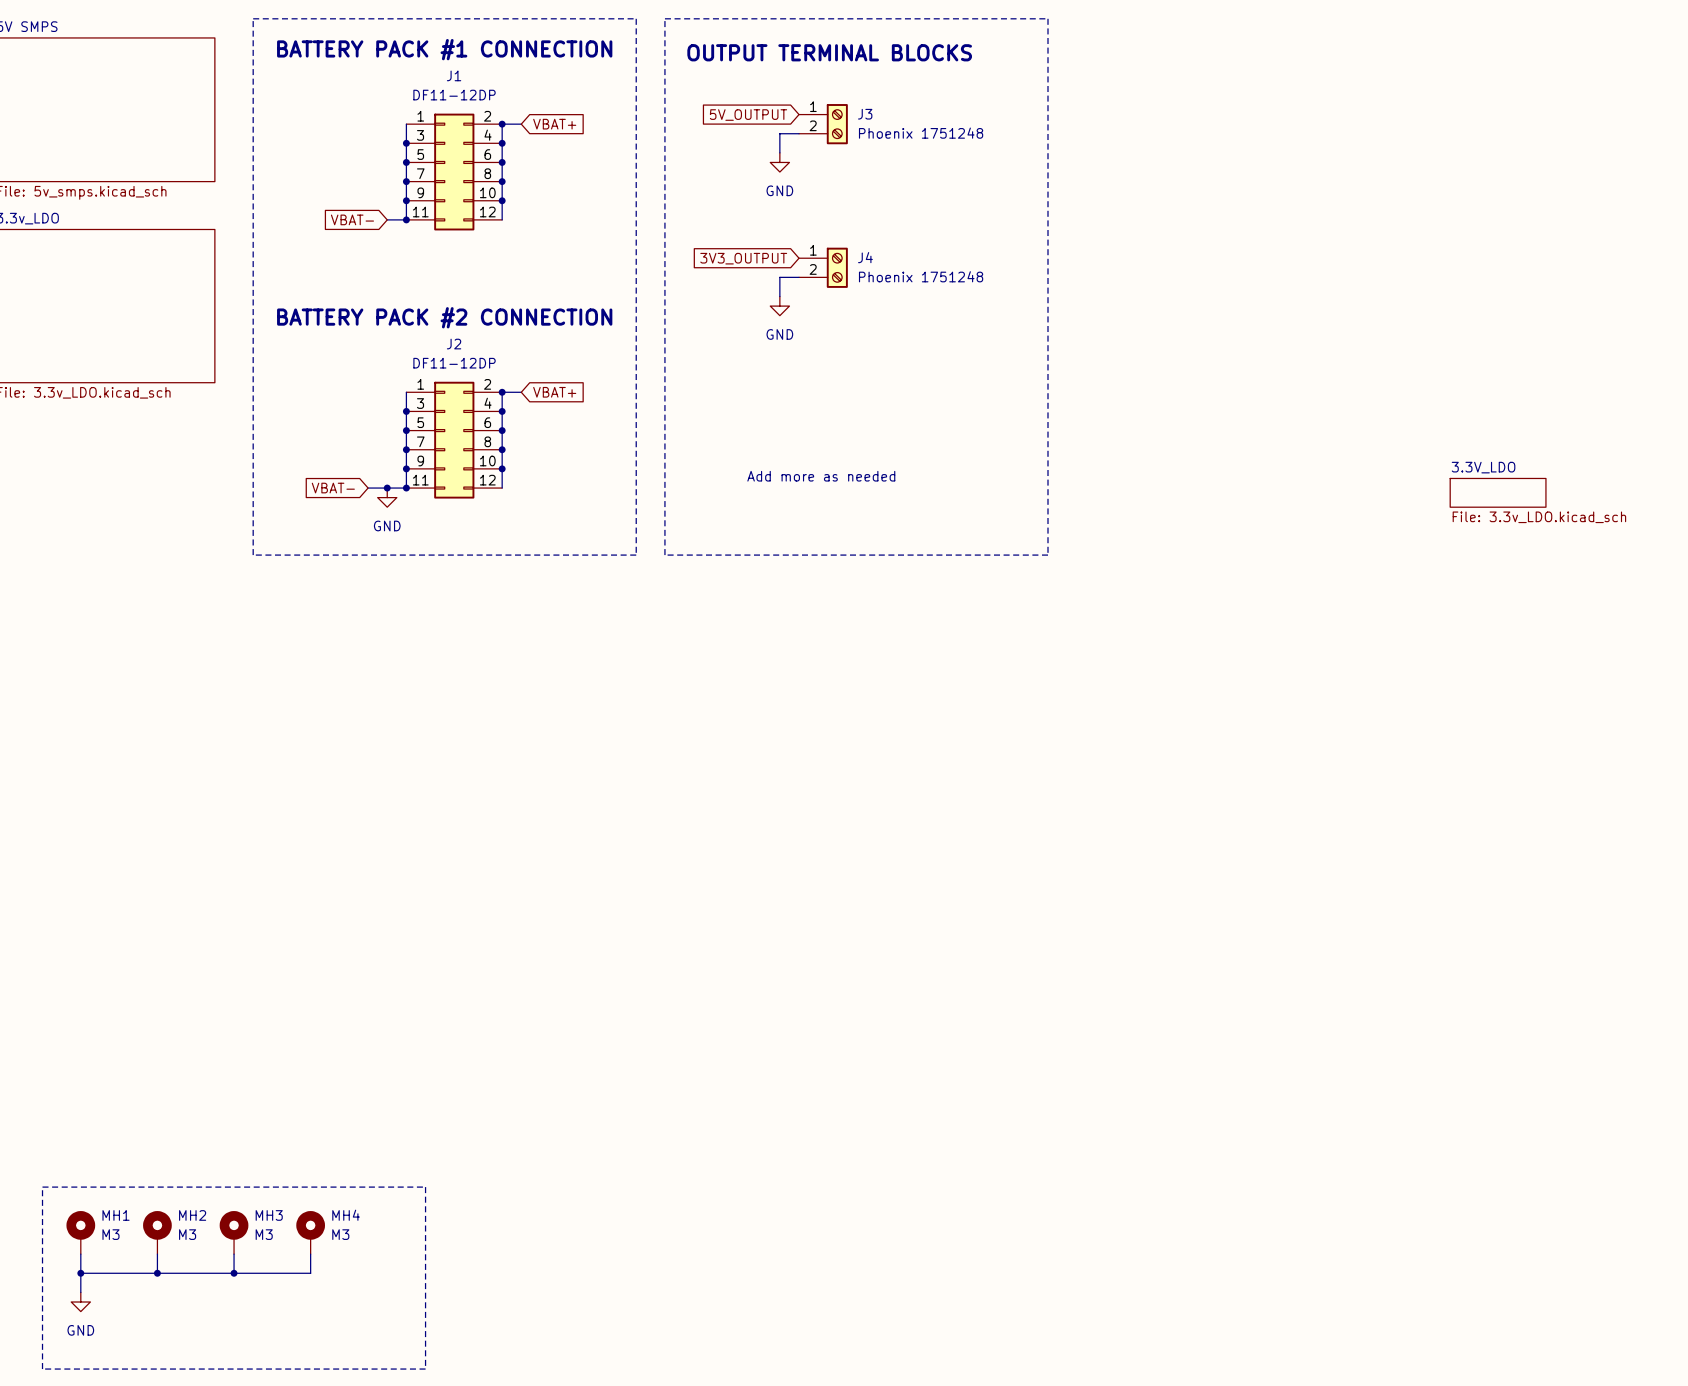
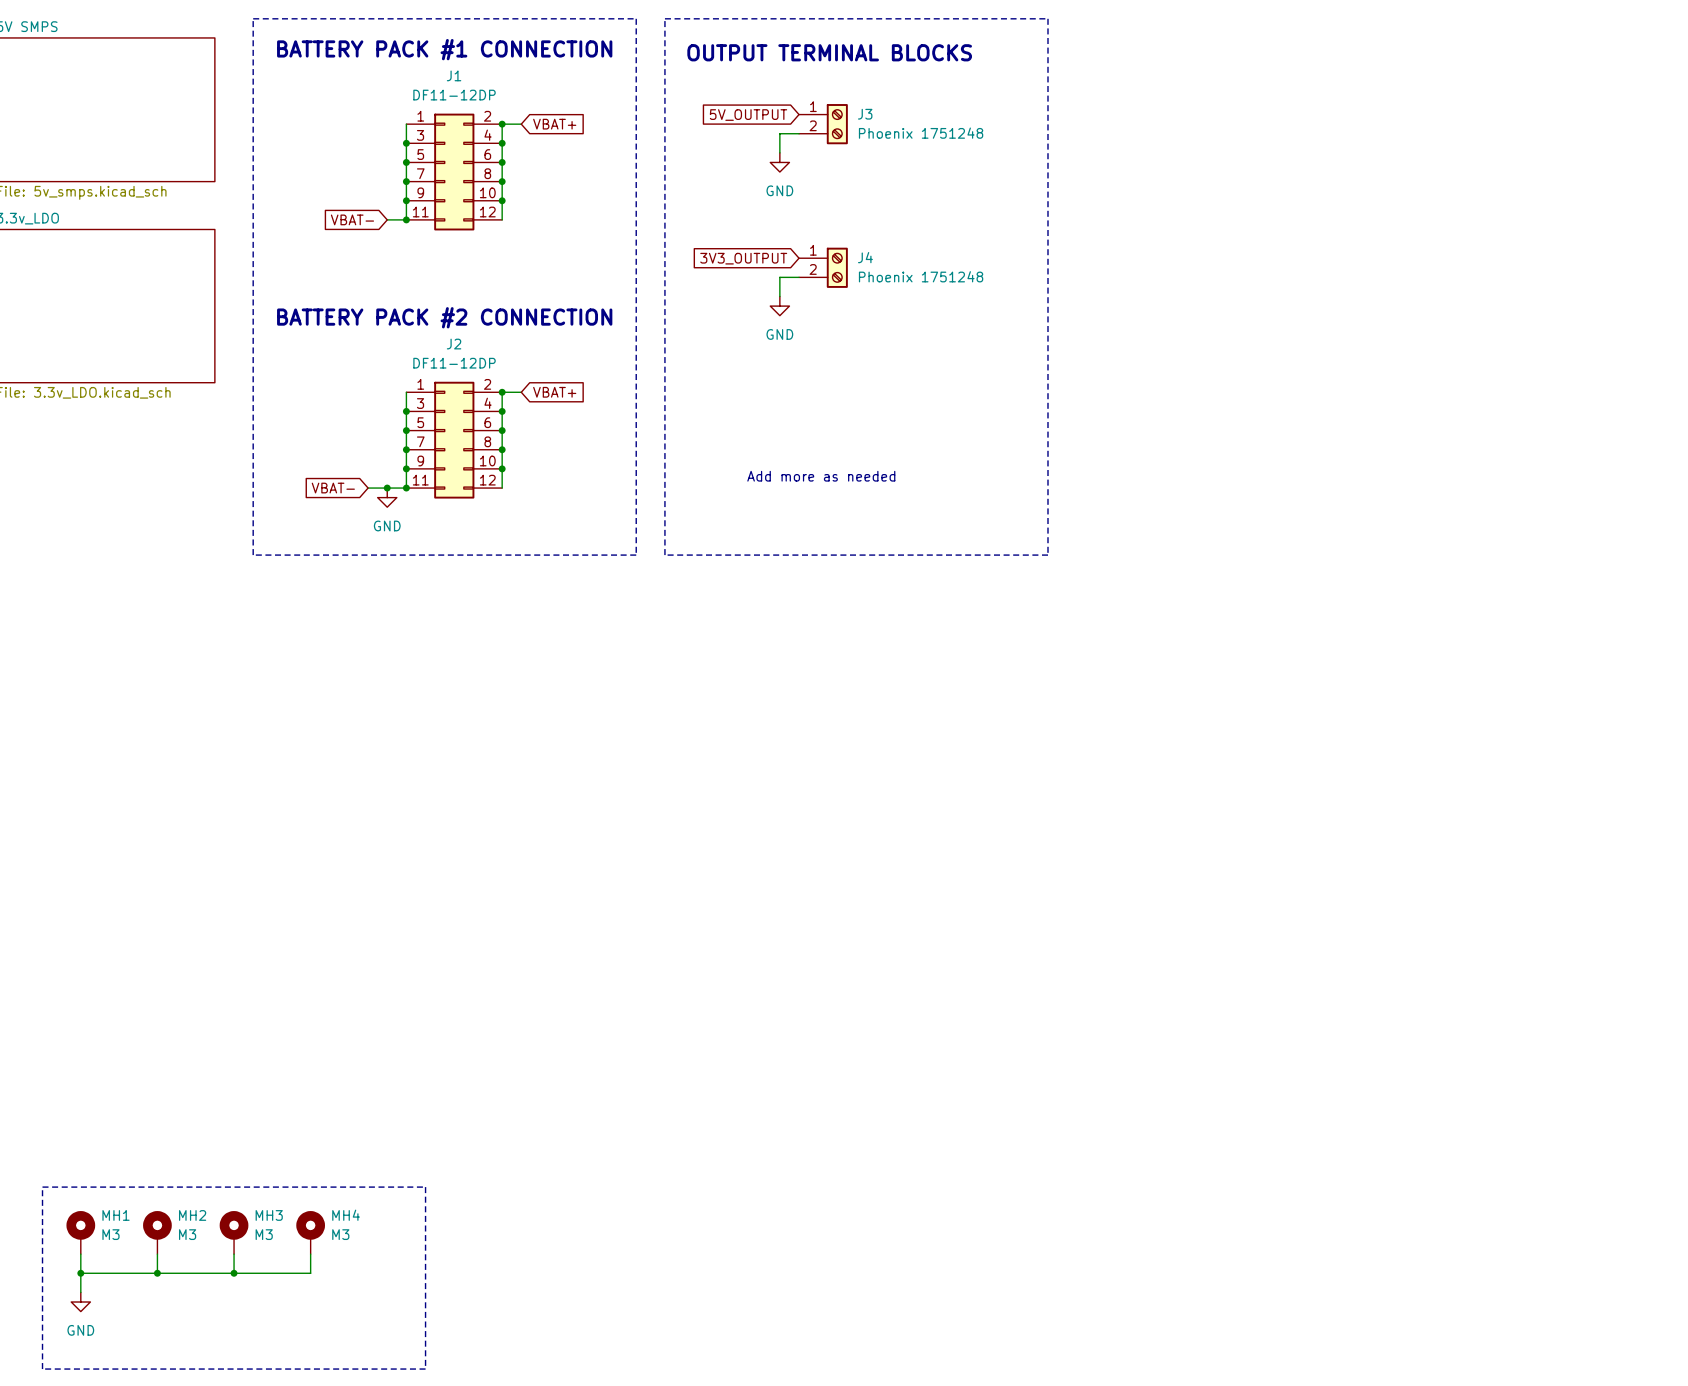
sheet 3.3V_LDO: File: 3.3v_LDO.kicad_sch (1498, 492) -> none

